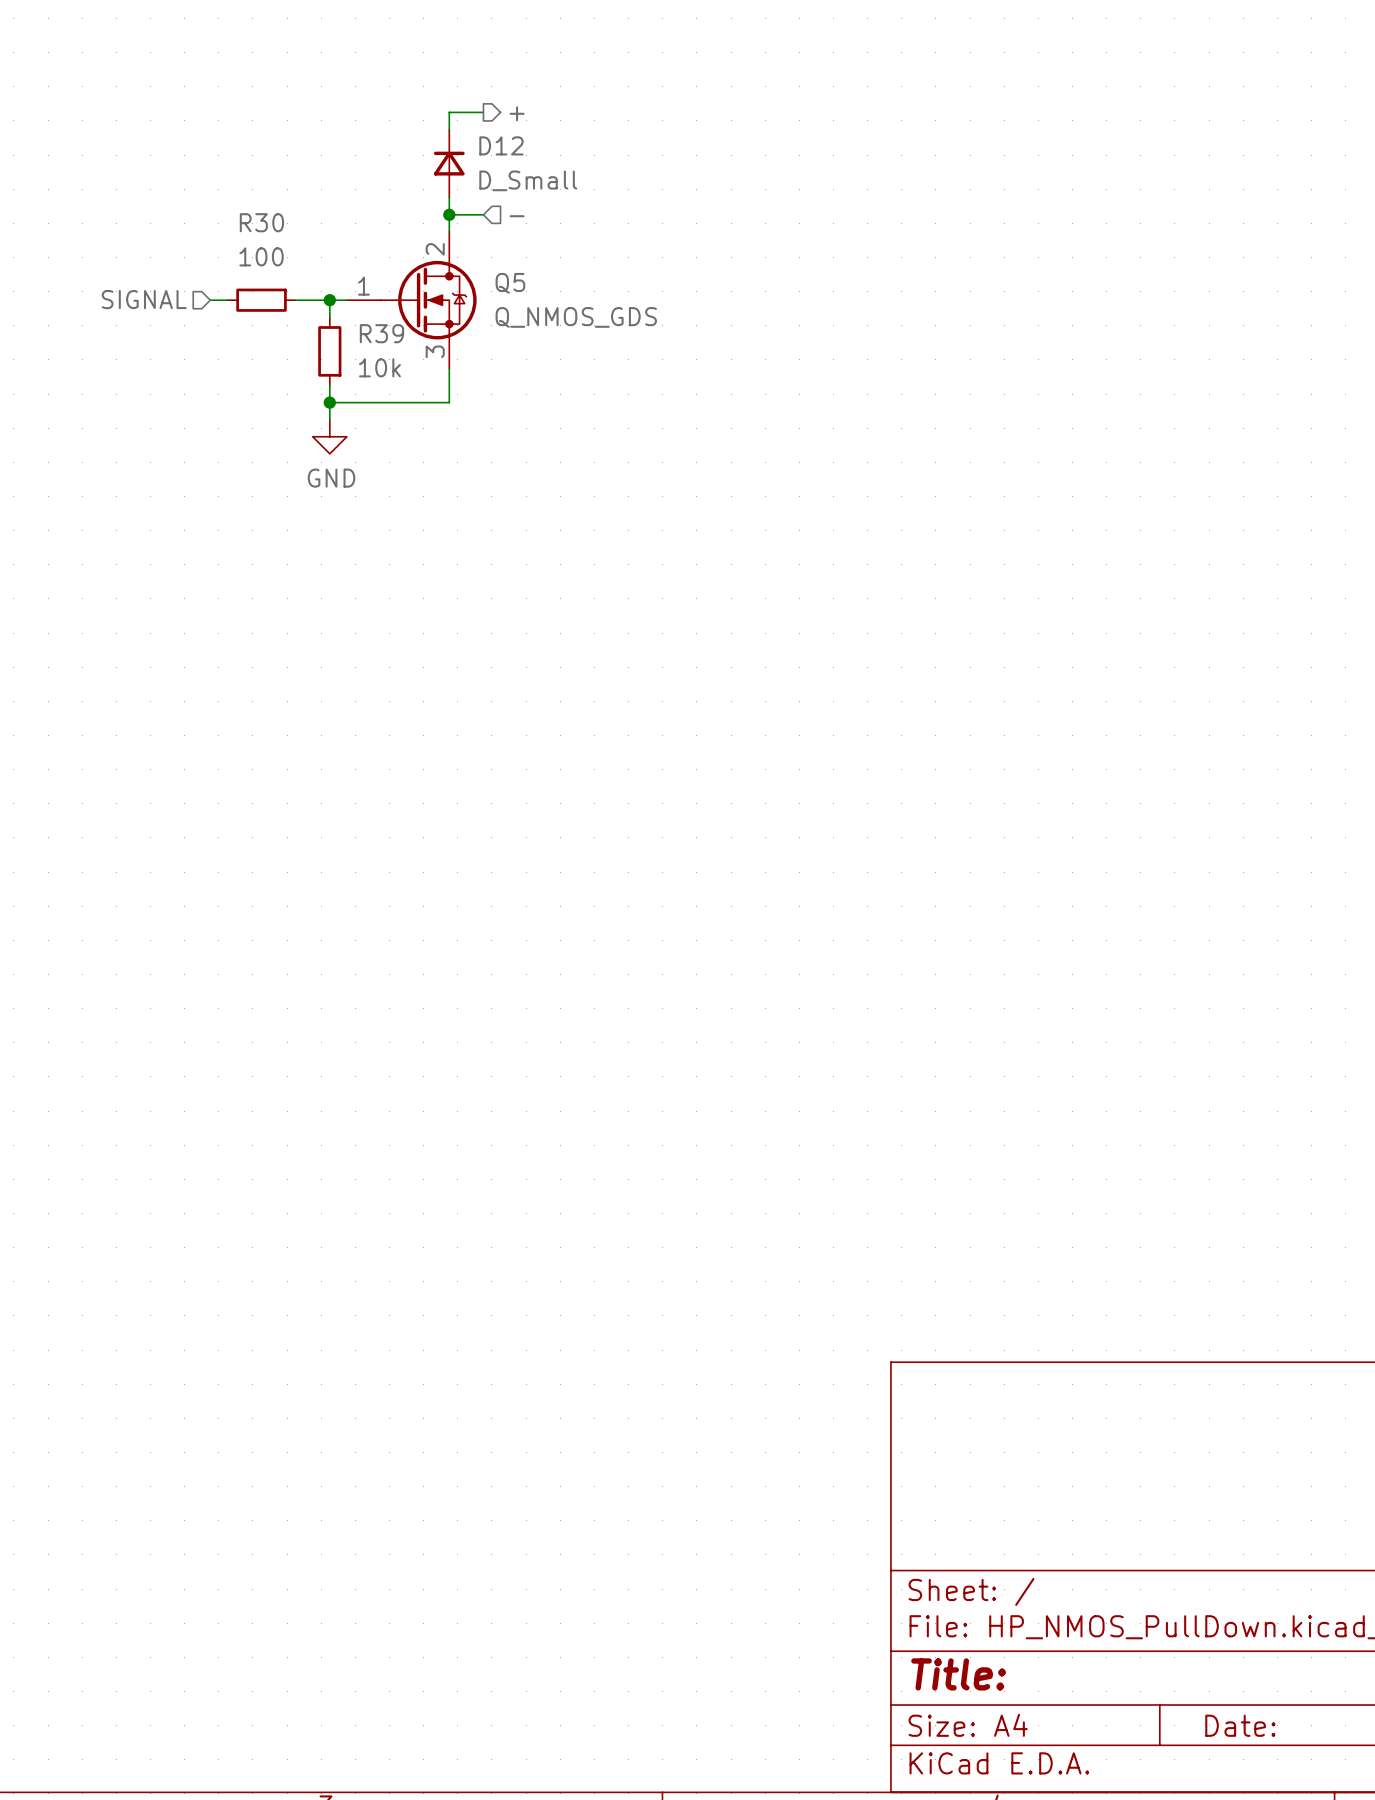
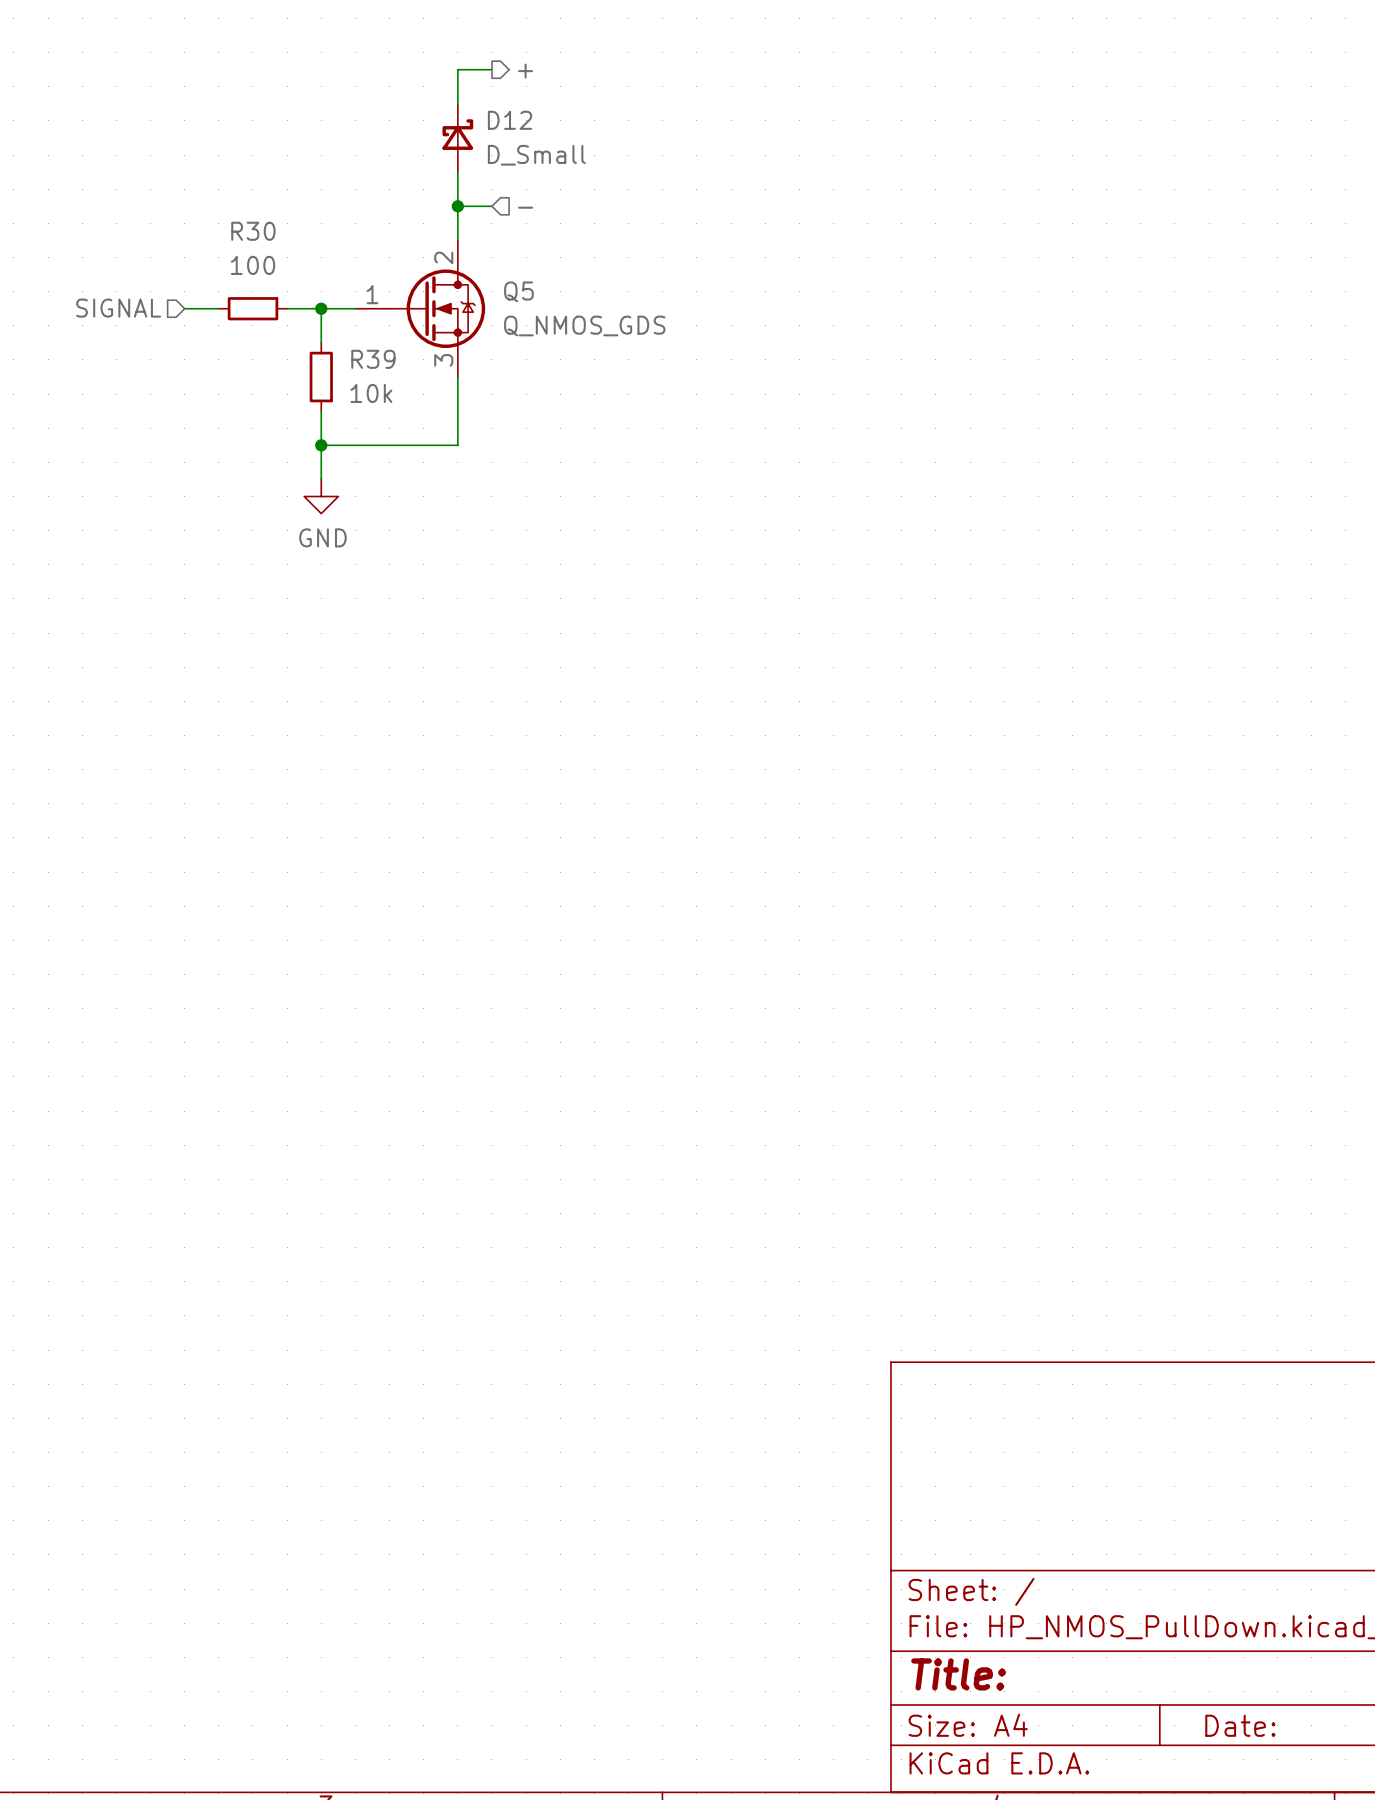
wire: none -> (491, 69) (457, 69) (457, 103)
wire: (483, 112) (449, 112) (449, 129) -> none
hierarchical label position: + (517, 113) -> + (525, 71)
D12 symbol: [433, 129, 465, 198] -> [442, 103, 474, 173]
wire: none -> (457, 172) (457, 240)
wire: (449, 197) (449, 231) -> none
wire: (449, 214) (483, 214) -> (457, 206) (491, 206)
junction position: (449, 214) -> (457, 206)
hierarchical label position: - (517, 216) -> - (525, 207)
hierarchical label position: SIGNAL (144, 299) -> SIGNAL (118, 308)
wire: (210, 300) (227, 300) -> none
R30 position: (261, 300) -> (252, 308)
wire: (295, 300) (346, 300) -> none
wire: (329, 300) (329, 317) -> none
junction position: (329, 300) -> (321, 308)
Q5 position: (411, 300) -> (420, 308)
wire: none -> (184, 308) (218, 308)
wire: none -> (287, 308) (355, 308)
R39 position: (329, 351) -> (321, 377)
wire: (449, 368) (449, 402) (329, 402) -> none
wire: none -> (457, 377) (457, 445) (321, 445)
wire: (329, 385) (329, 419) -> (321, 308) (321, 342)
junction position: (329, 402) -> (321, 445)
wire: none -> (321, 411) (321, 479)
power symbol position: GND (329, 436) -> GND (321, 496)

